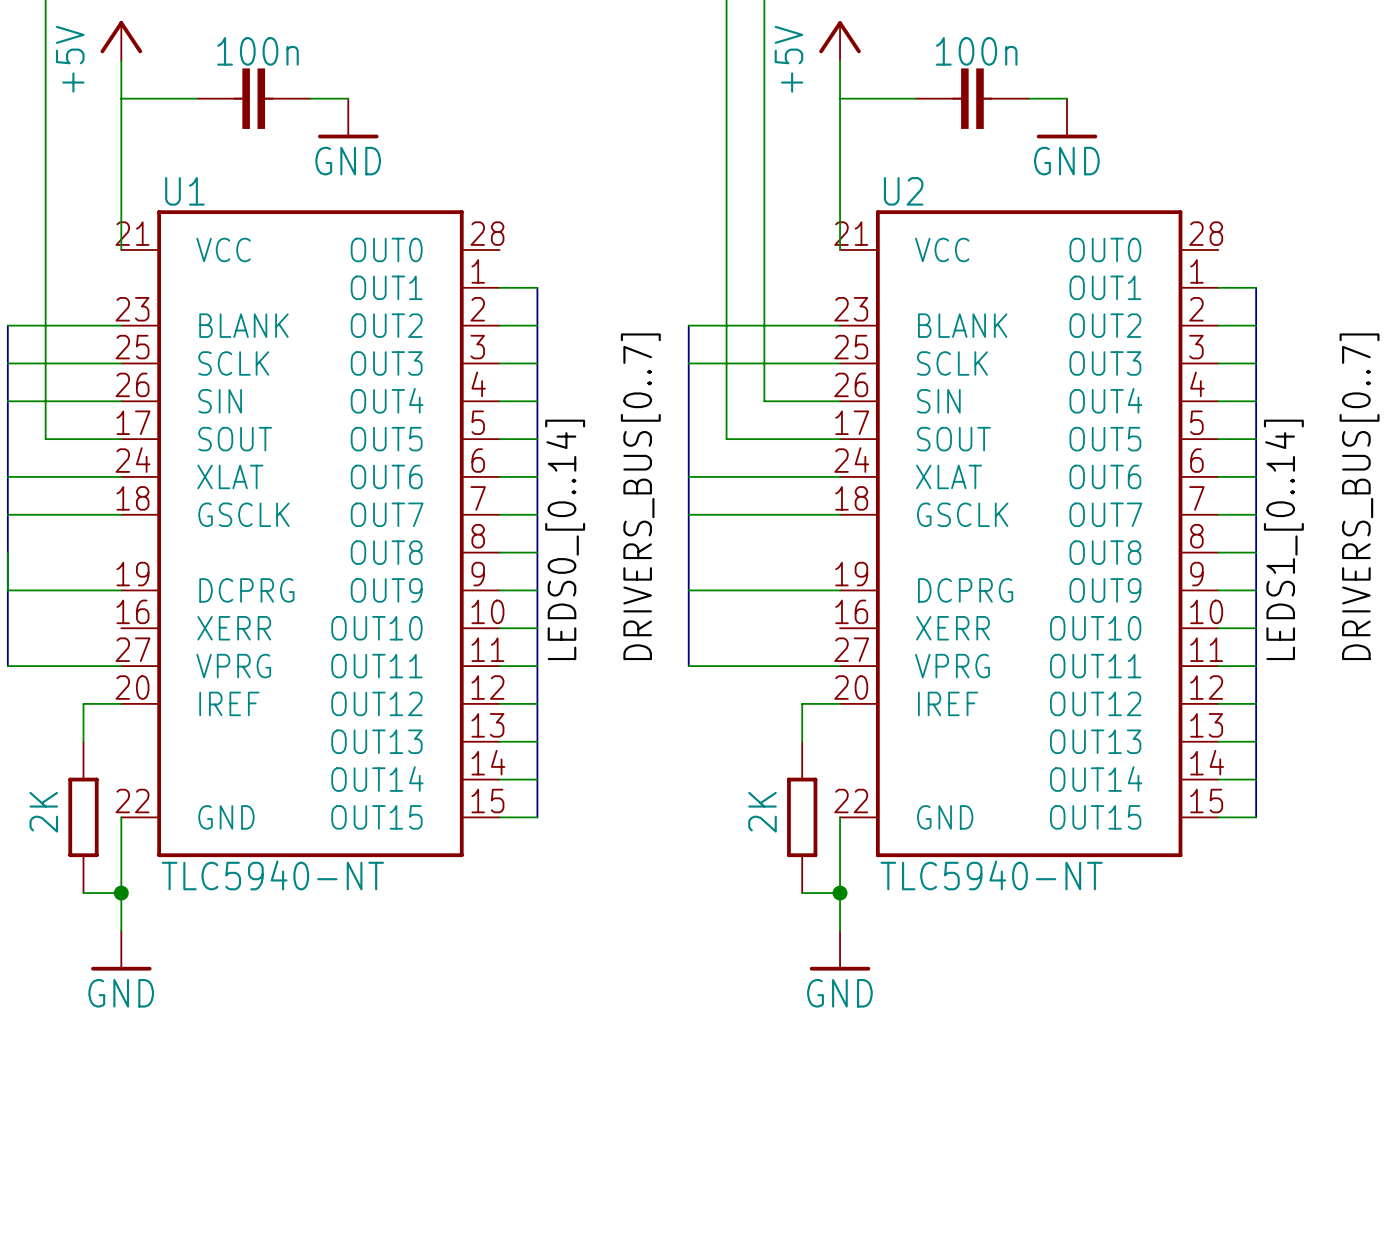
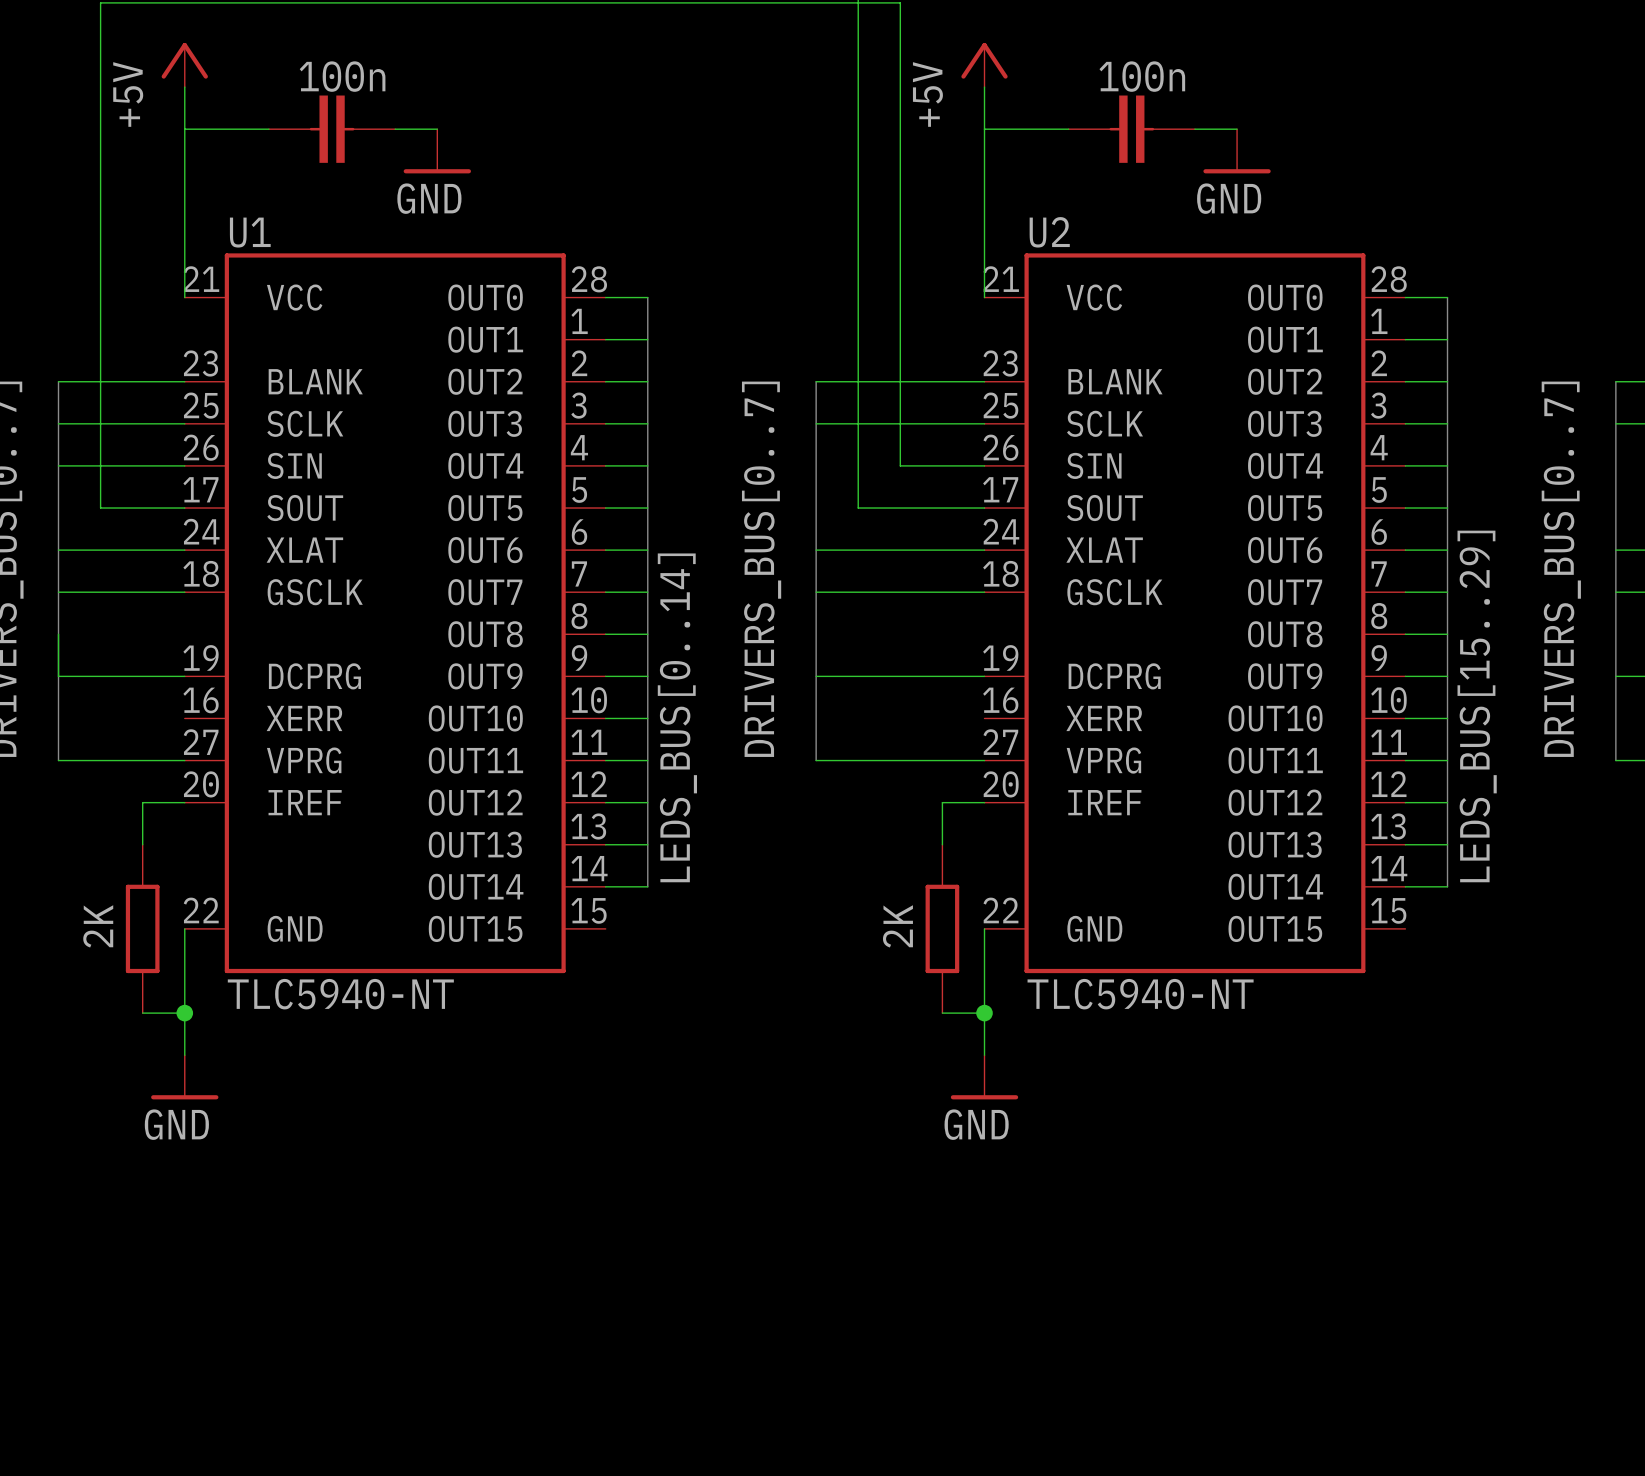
wire: none -> (605, 297) (647, 297)
bus: none -> (647, 297) (647, 339)
wire: none -> (1405, 297) (1447, 297)
bus: none -> (1447, 297) (1447, 339)
label: LEDS0_[0..14] (565, 539) -> LEDS_BUS[0..14] (677, 717)
label: LEDS1_[0..14] (1283, 539) -> none
label: none -> LEDS_BUS[15..29] (1477, 706)
bus: (537, 779) (537, 817) -> none
bus: (1256, 779) (1256, 817) -> none
wire: (499, 817) (537, 817) -> none
wire: (1218, 817) (1256, 817) -> none

